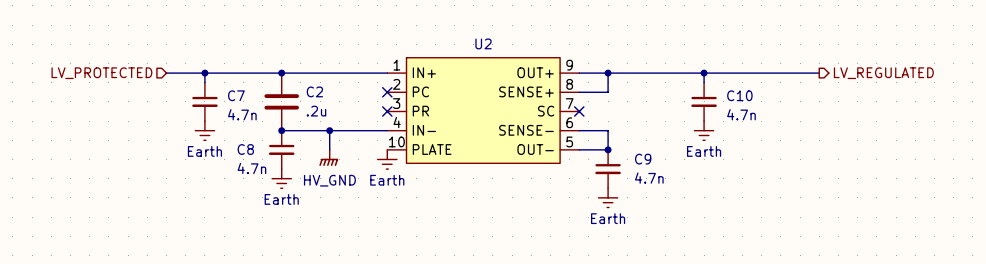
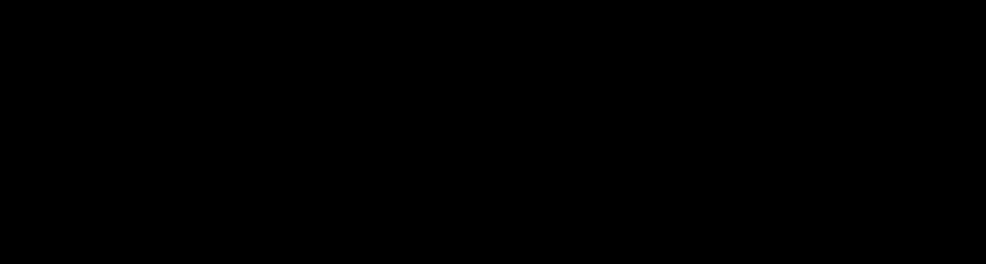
hierarchical label: LV_PROTECTED (101, 73) -> none
wire: (166, 73) (387, 73) -> none
wire: (204, 73) (204, 82) -> none
junction: (204, 73) -> none
junction: (281, 73) -> none
wire: (579, 73) (819, 73) -> none
wire: (608, 73) (608, 92) (579, 92) -> none
junction: (608, 73) -> none
wire: (704, 73) (704, 82) -> none
junction: (704, 73) -> none
hierarchical label: LV_REGULATED (883, 73) -> none
no-connect mark: (387, 92) -> none
C7: 4.7n (204, 101) -> none
C2: .2u (281, 101) -> none
C10: 4.7n (704, 101) -> none
U2: (483, 110) -> none
no-connect mark: (387, 111) -> none
no-connect mark: (579, 111) -> none
power symbol: Earth (204, 130) -> none
wire: (281, 130) (387, 130) -> none
junction: (281, 130) -> none
wire: (329, 130) (329, 149) -> none
junction: (329, 130) -> none
wire: (579, 130) (608, 130) (608, 149) (579, 149) -> none
power symbol: Earth (704, 130) -> none
C8: 4.7n (281, 149) -> none
junction: (608, 149) -> none
power symbol: HV_GND (328, 157) -> none
power symbol: Earth (387, 159) -> none
C9: 4.7n (608, 169) -> none
power symbol: Earth (281, 178) -> none
power symbol: Earth (608, 197) -> none

